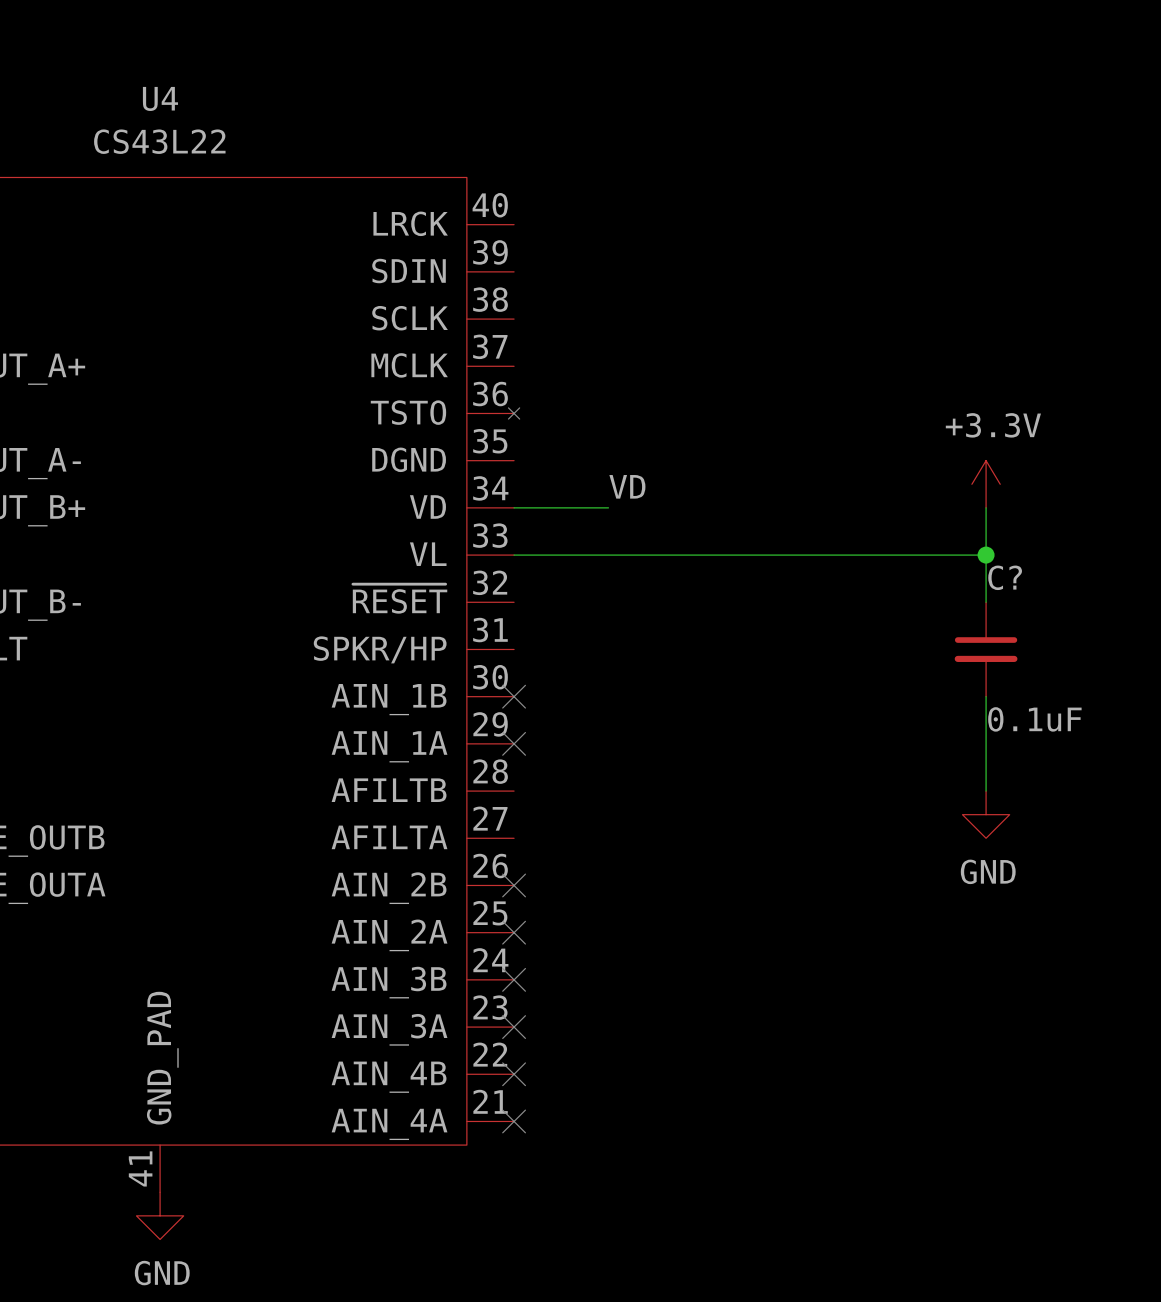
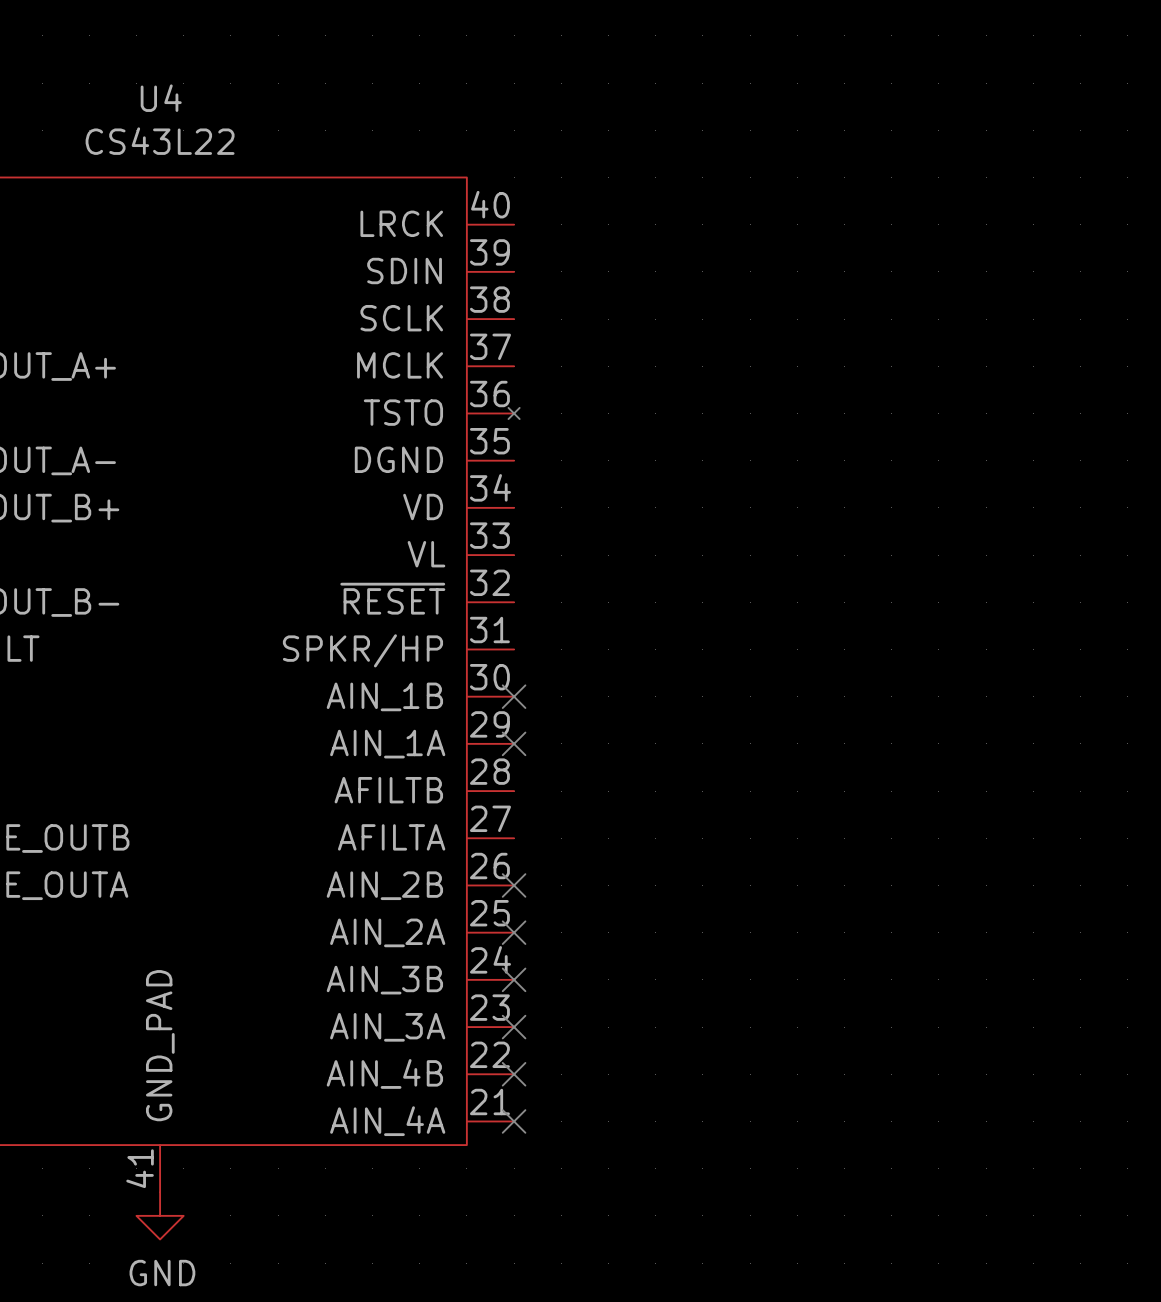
power symbol: +3.3V (986, 484) -> none
label: VD (627, 486) -> none
wire: (514, 507) (608, 507) -> none
wire: (986, 507) (986, 602) -> none
wire: (514, 555) (986, 555) -> none
junction: (986, 555) -> none
C?: 0.1uF (986, 649) -> none
wire: (986, 696) (986, 791) -> none
power symbol: GND (986, 814) -> none

